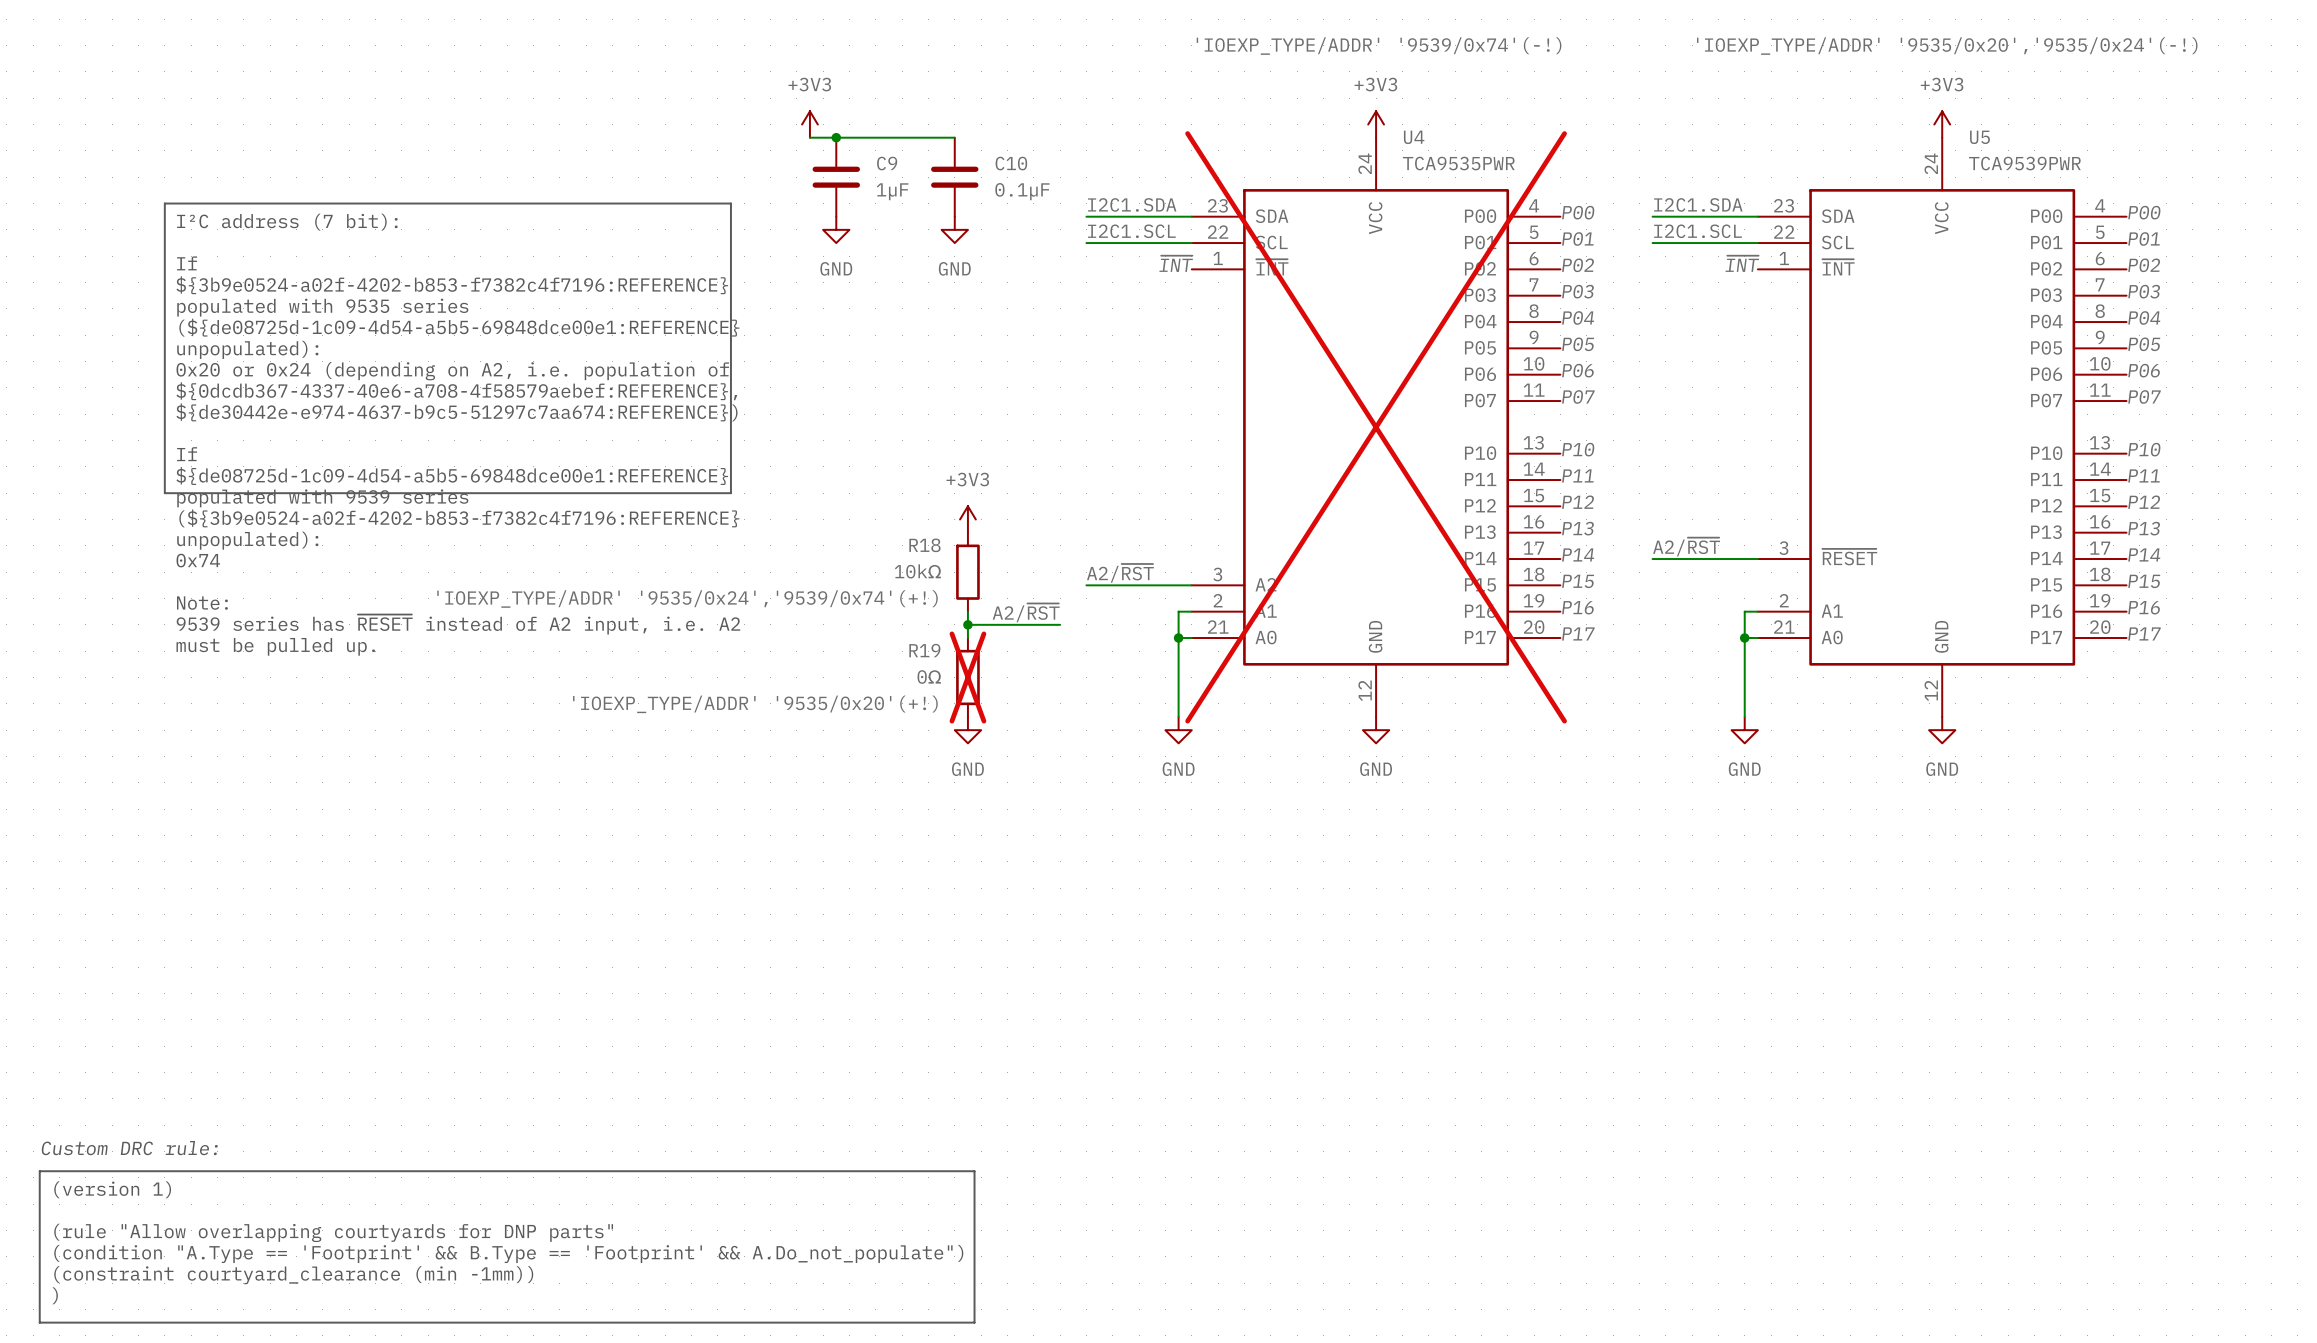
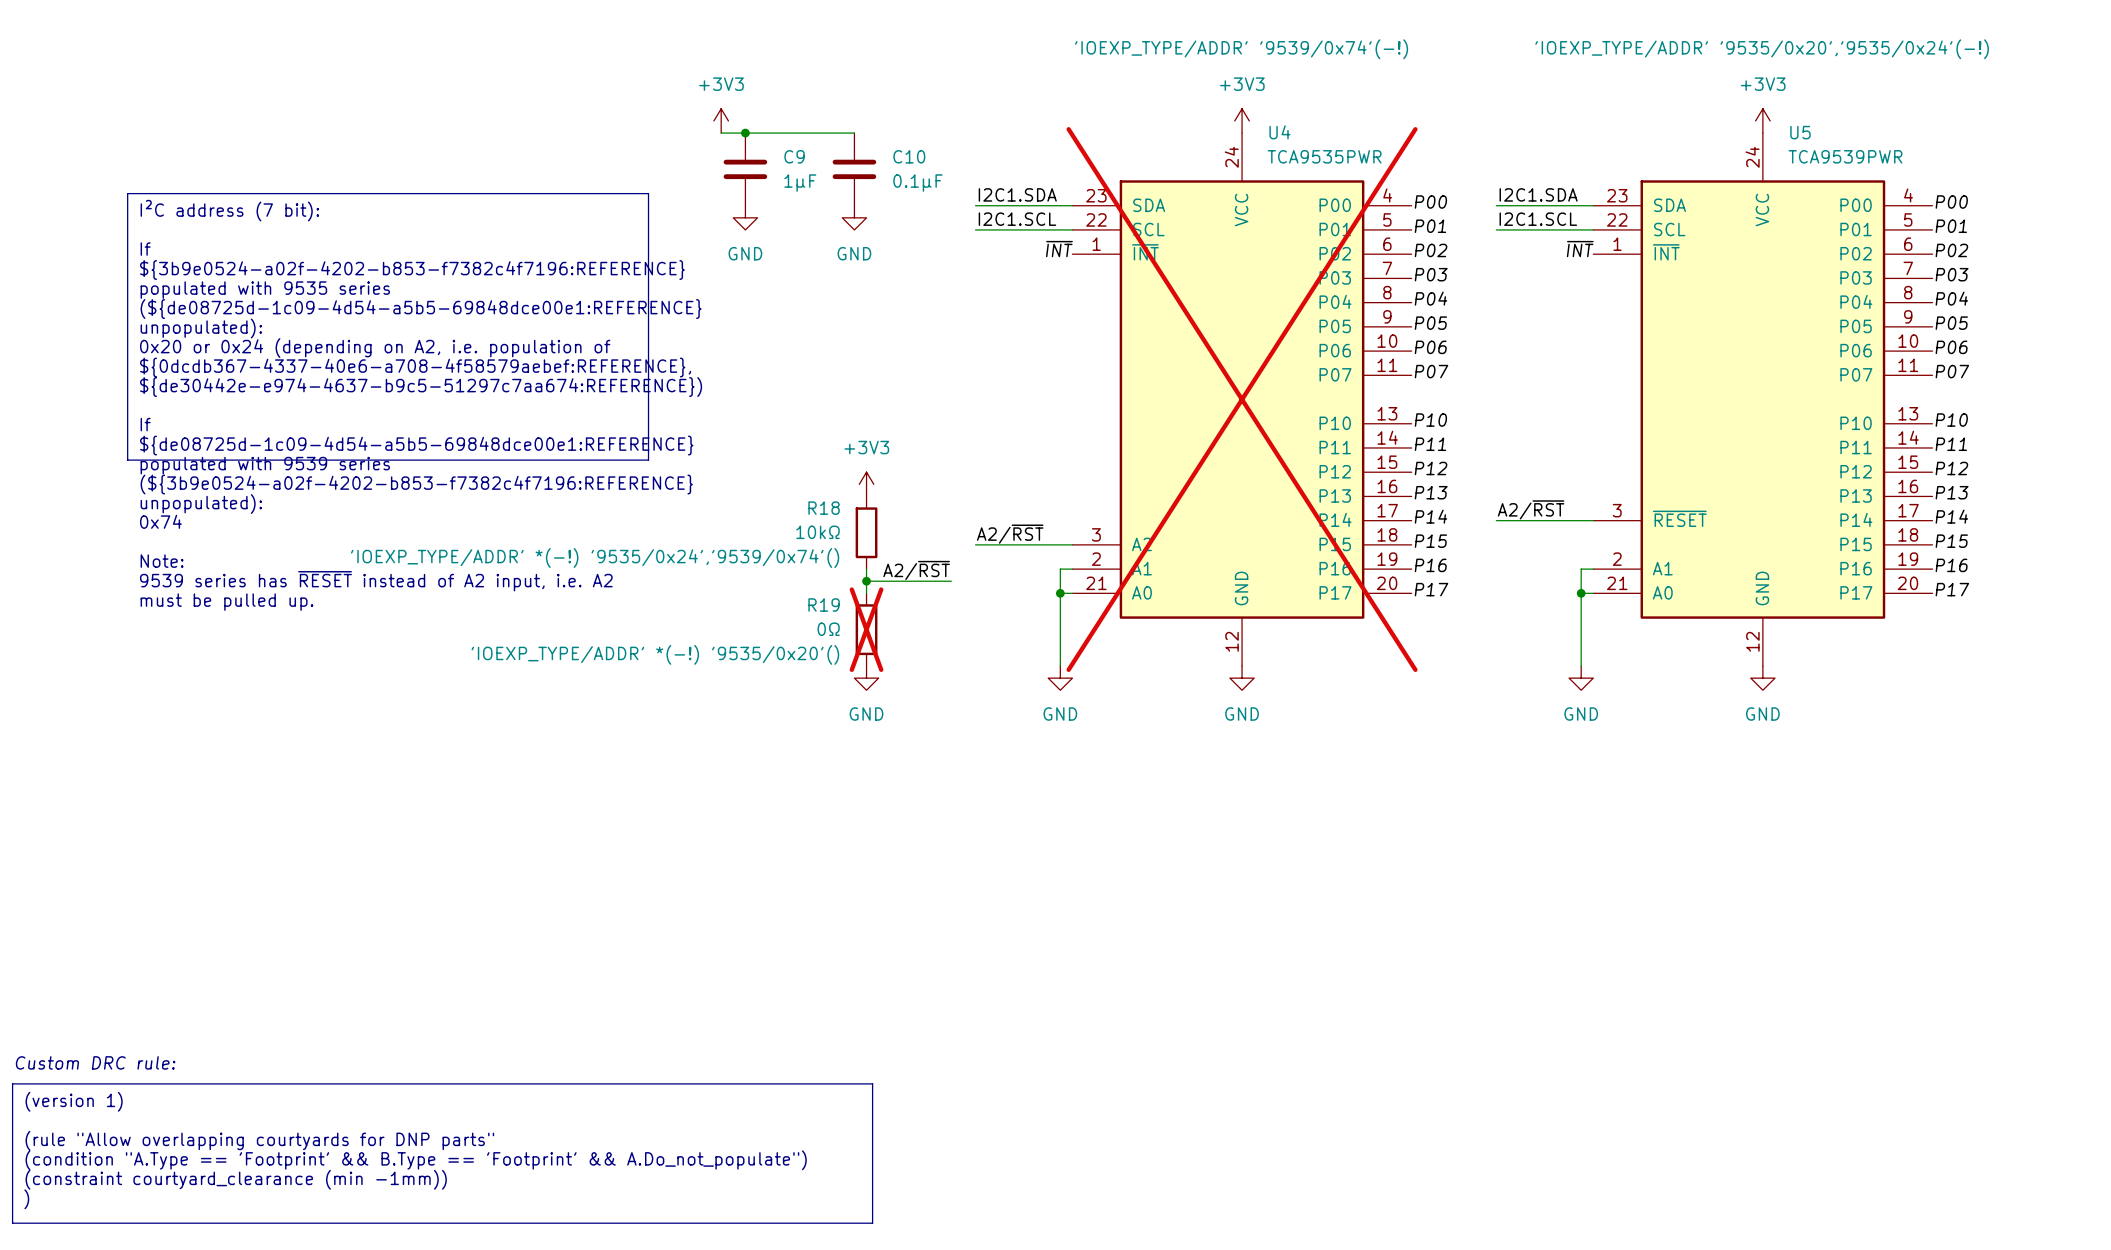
R18 text: 'IOEXP_TYPE/ADDR' '9535/0x24','9539/0x74'(+!) (687, 599) -> 'IOEXP_TYPE/ADDR' *(-!) '9535/0x24','9539/0x74'() (595, 557)
R19 text: 'IOEXP_TYPE/ADDR' '9535/0x20'(+!) (755, 704) -> 'IOEXP_TYPE/ADDR' *(-!) '9535/0x20'() (655, 654)

